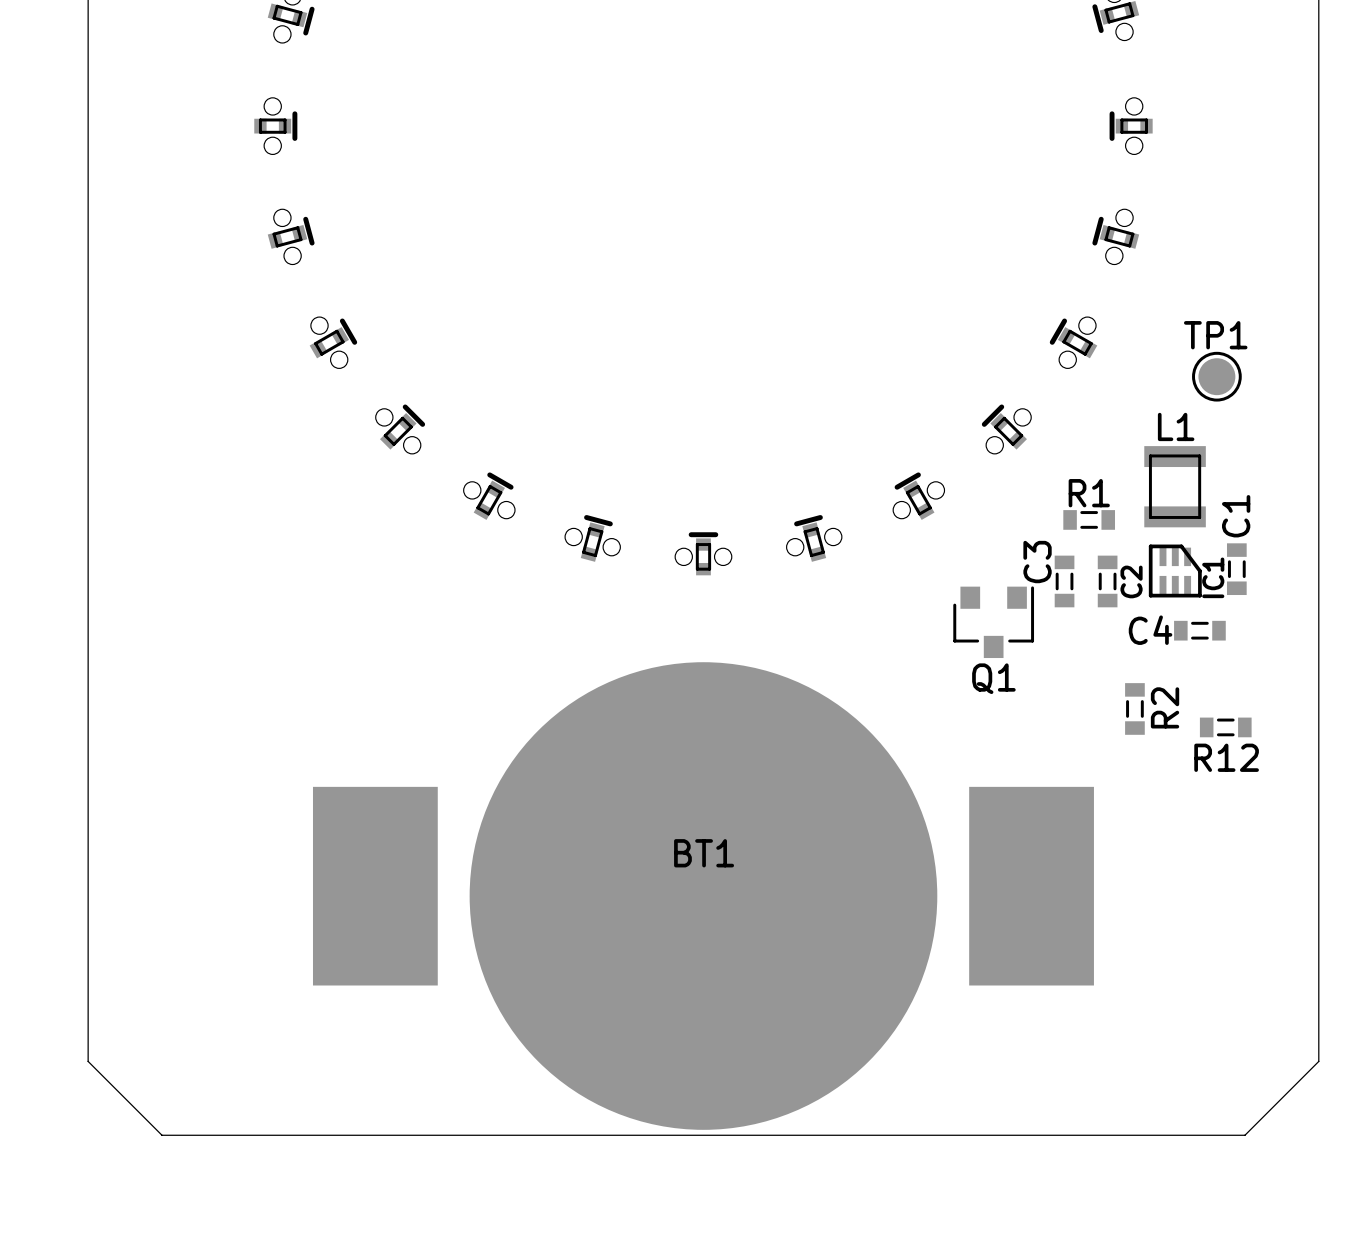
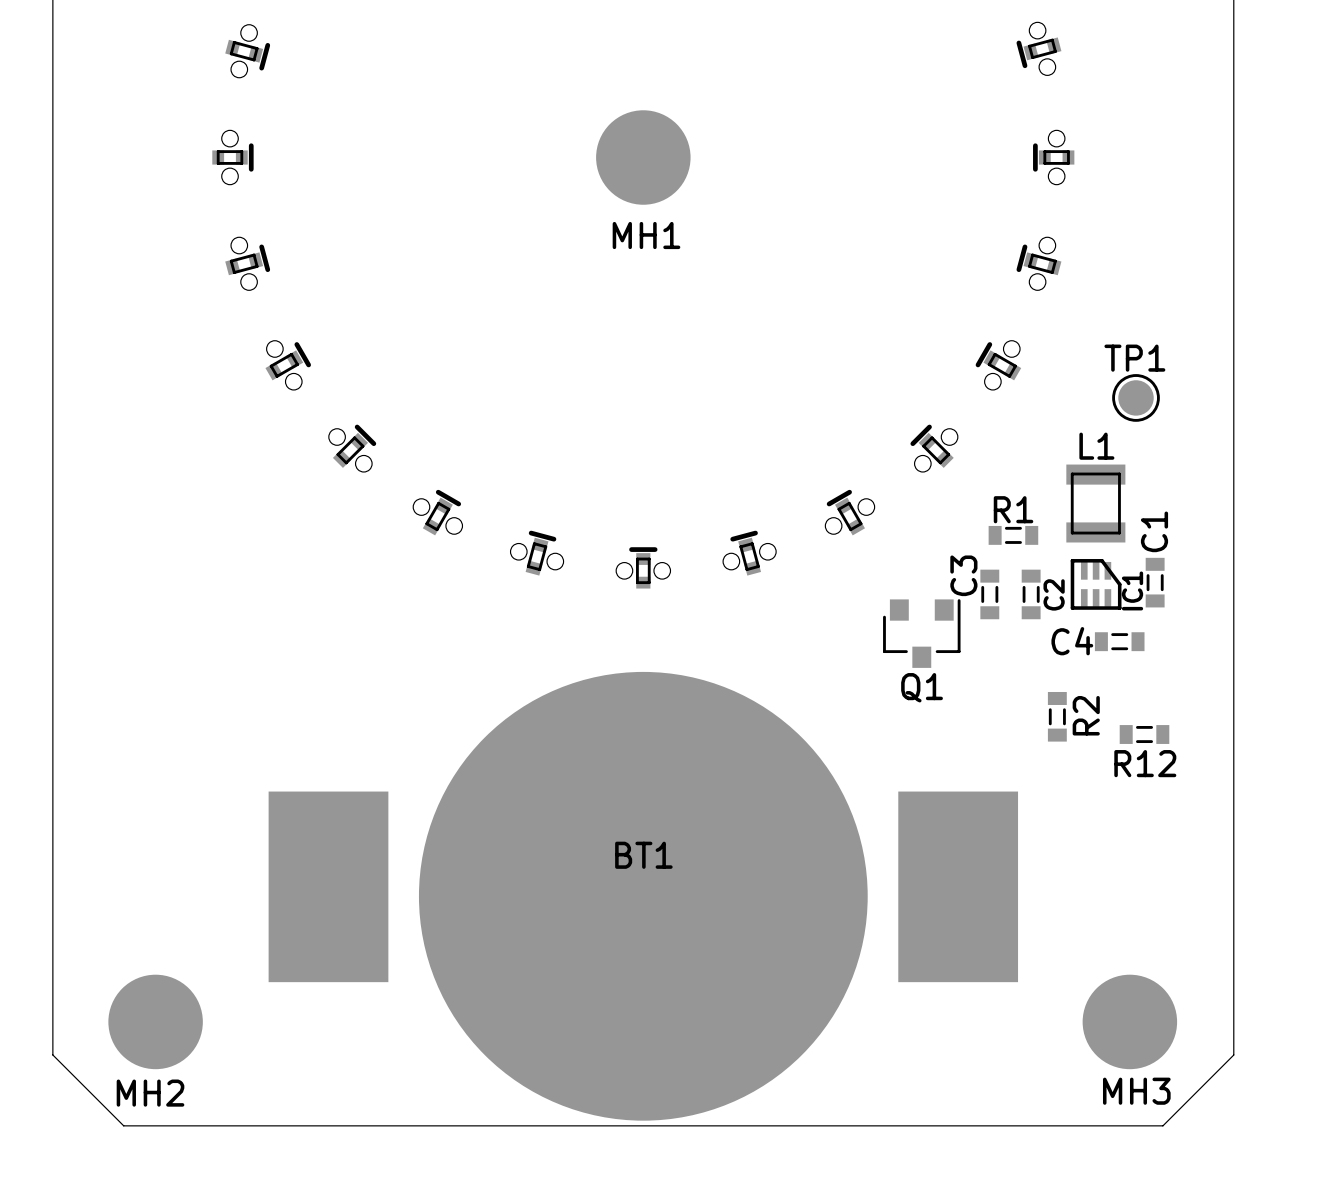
MH1: none -> (643, 157)
MH2: none -> (155, 1021)
MH3: none -> (1129, 1021)

